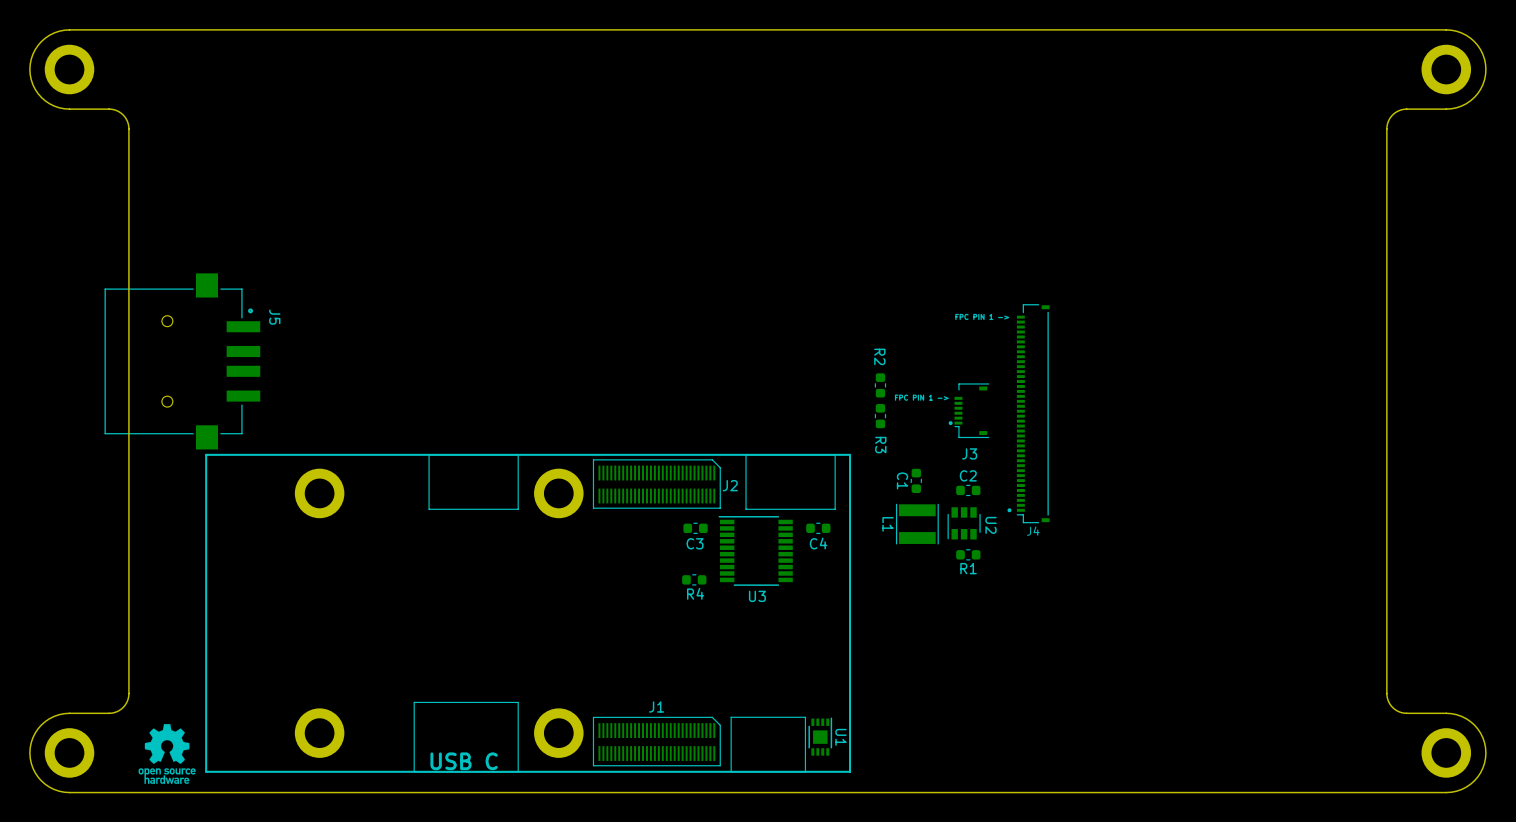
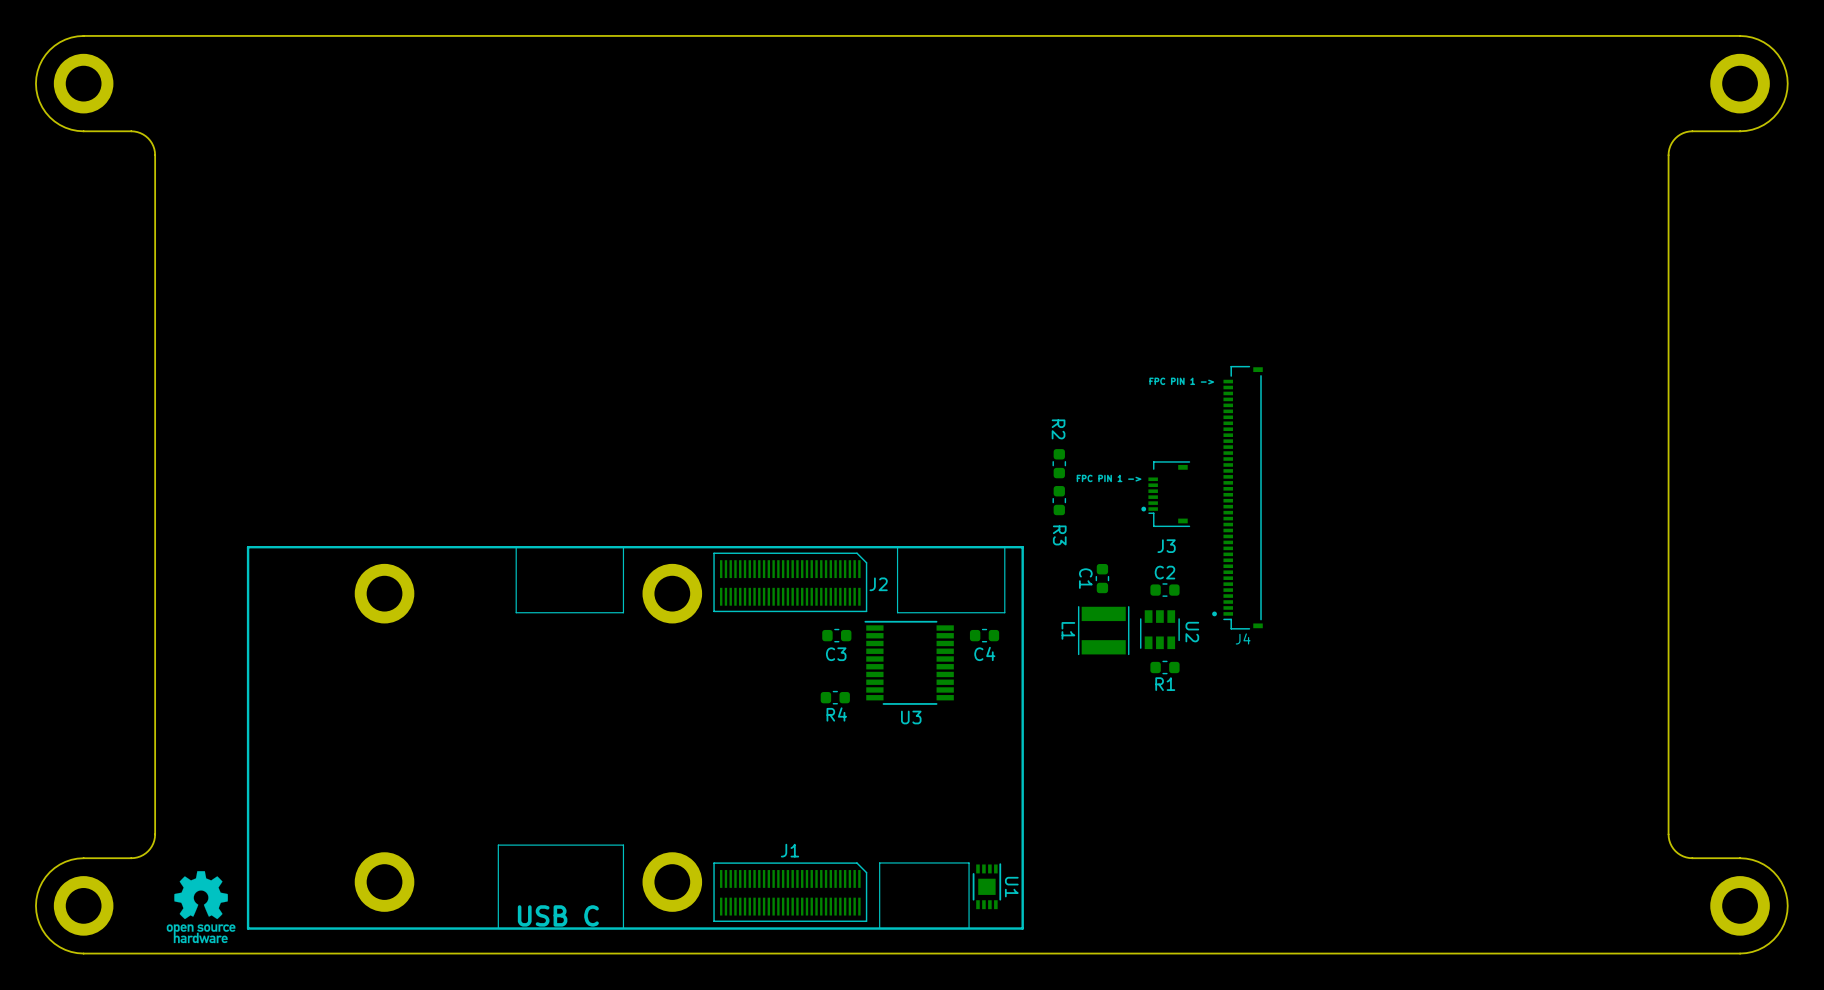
J5: (182, 361) -> none

